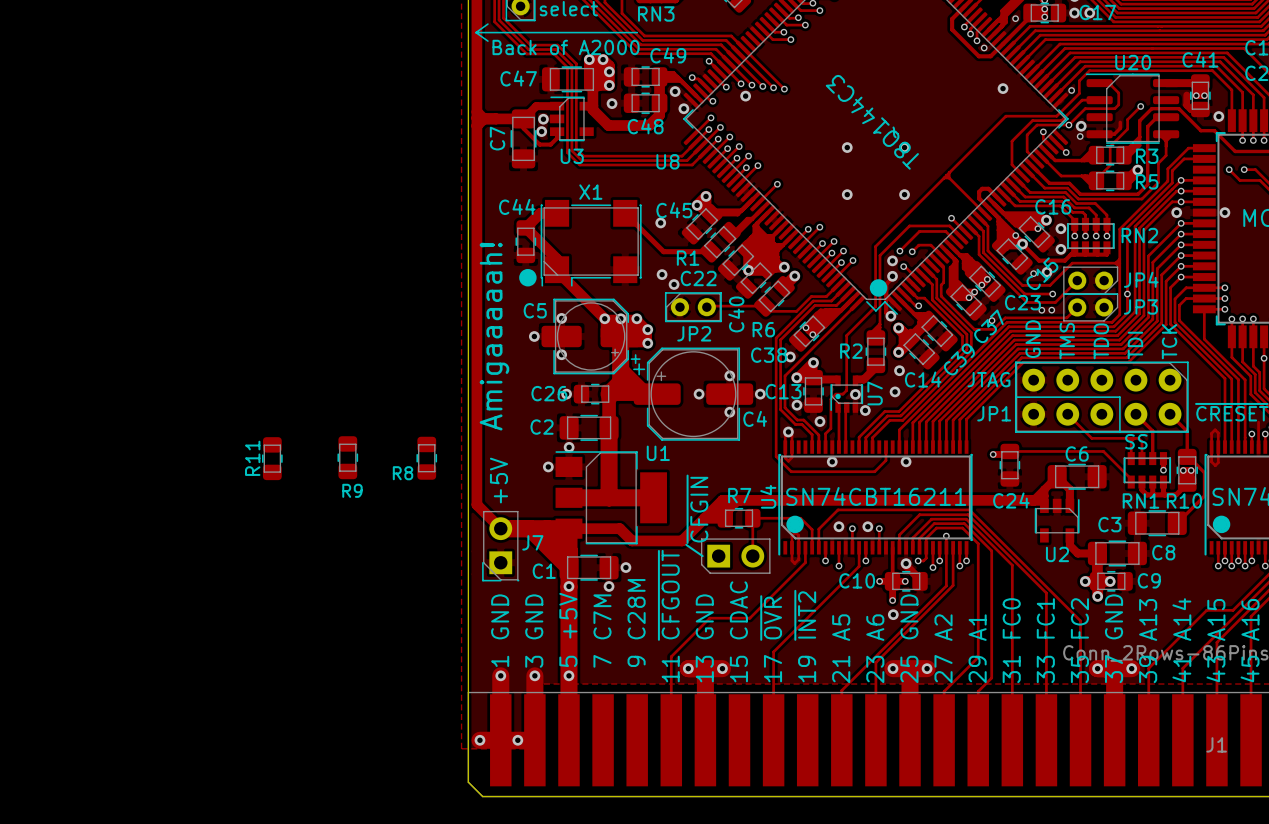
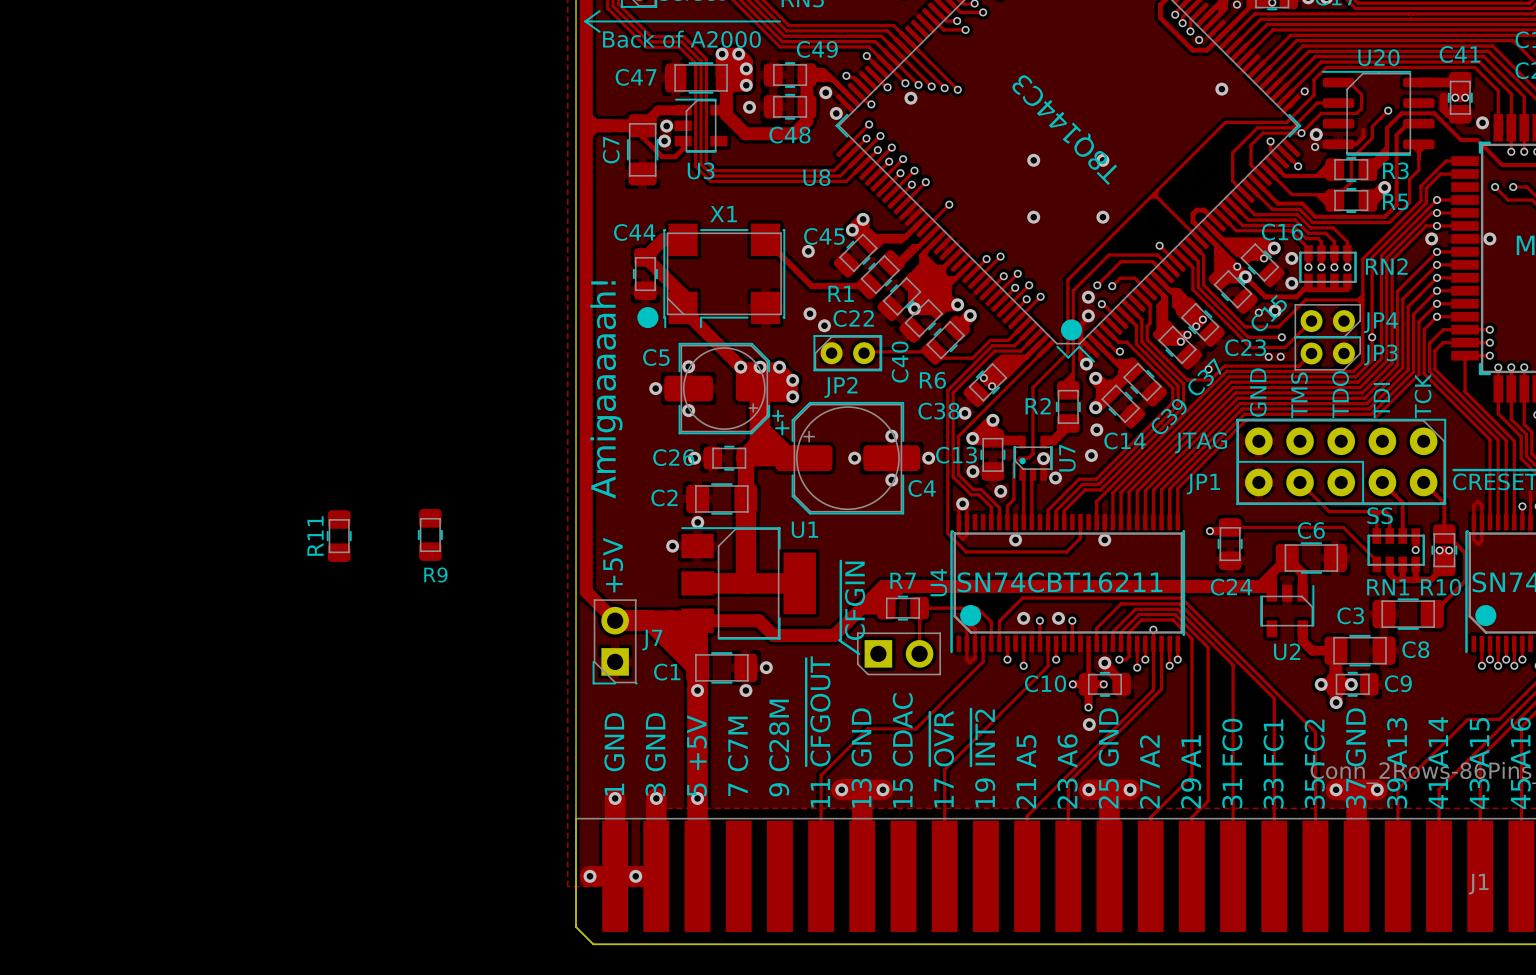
R8: (426, 458) -> none

